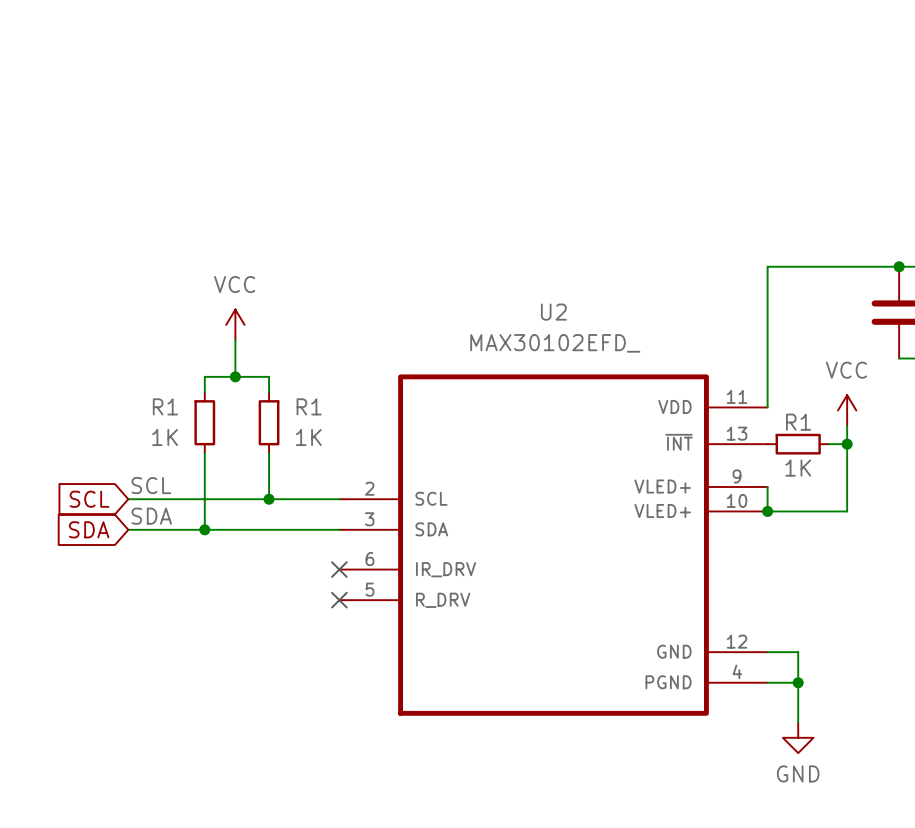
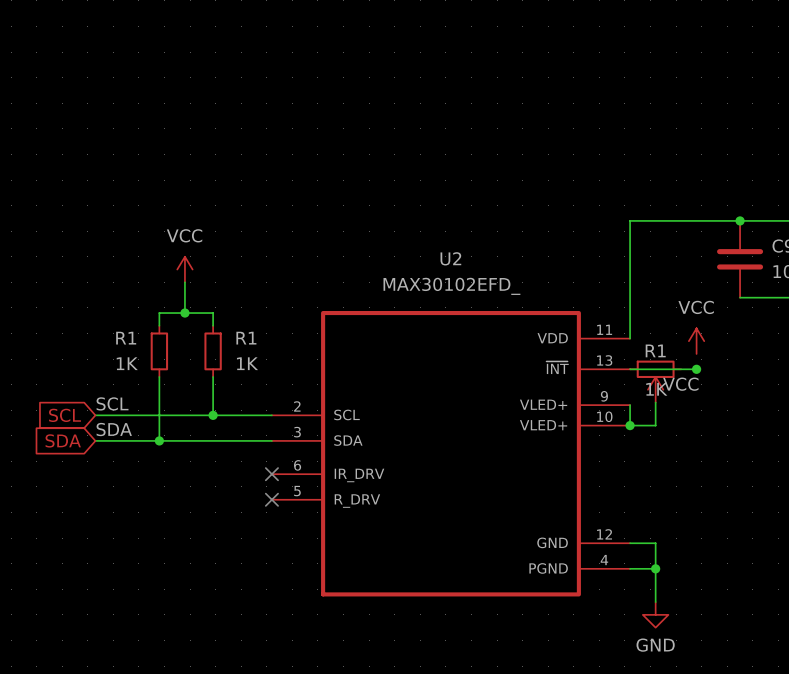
wire: (847, 425) (847, 511) (798, 511) -> (655, 402) (655, 425)
wire: none -> (630, 369) (681, 369)
power symbol: none -> VCC (655, 389)

